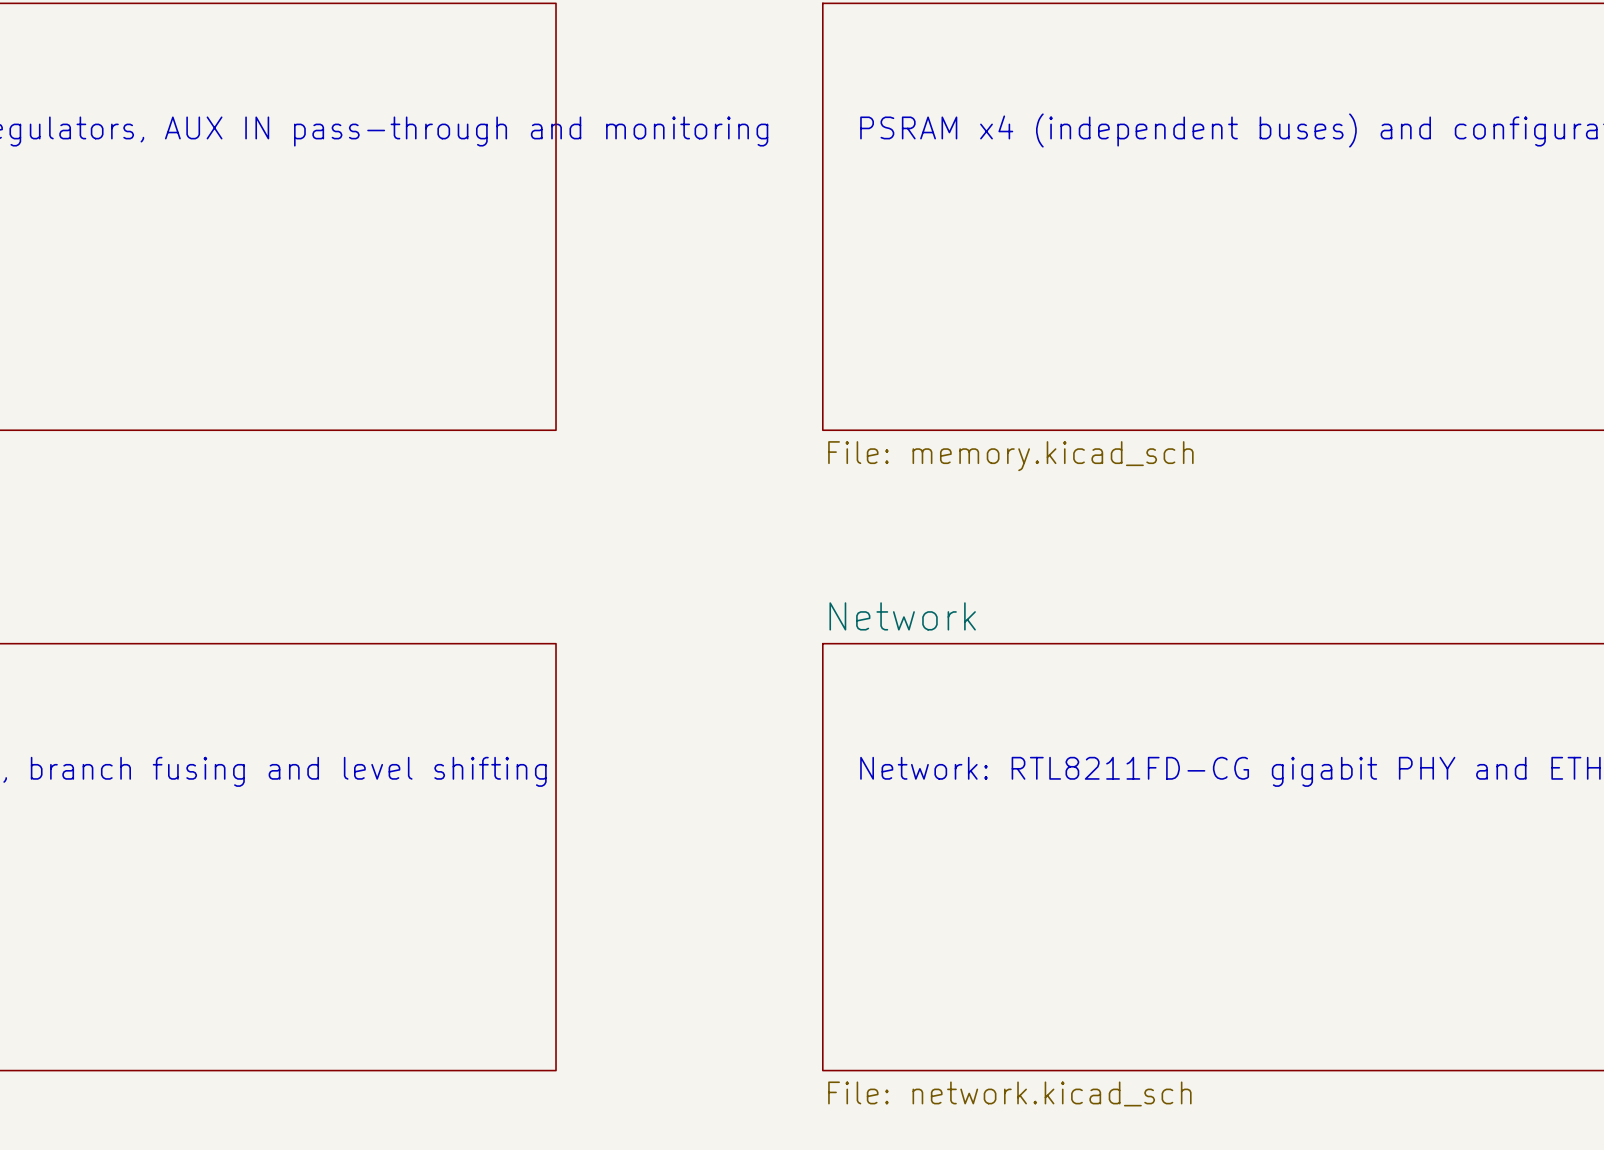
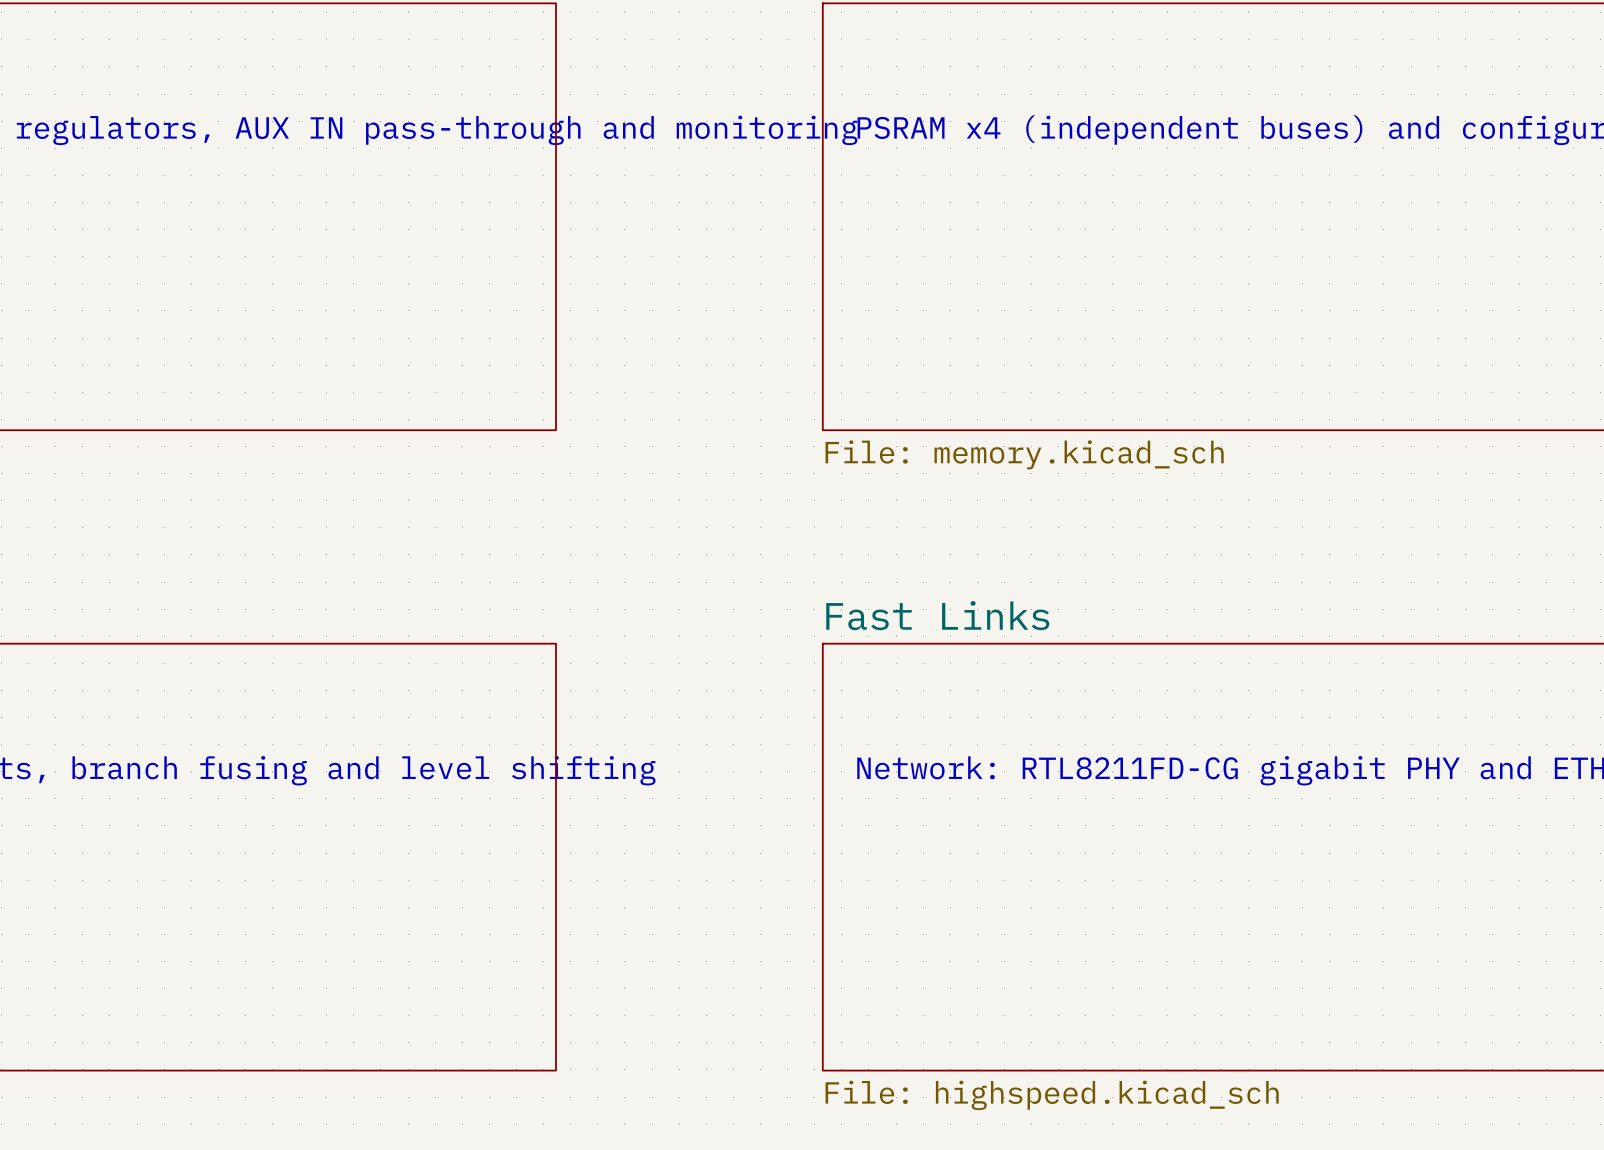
sheet Network name: Network (902, 616) -> Fast Links (937, 615)
sheet Network value: File: network.kicad_sch (1009, 1093) -> File: highspeed.kicad_sch (1052, 1095)

